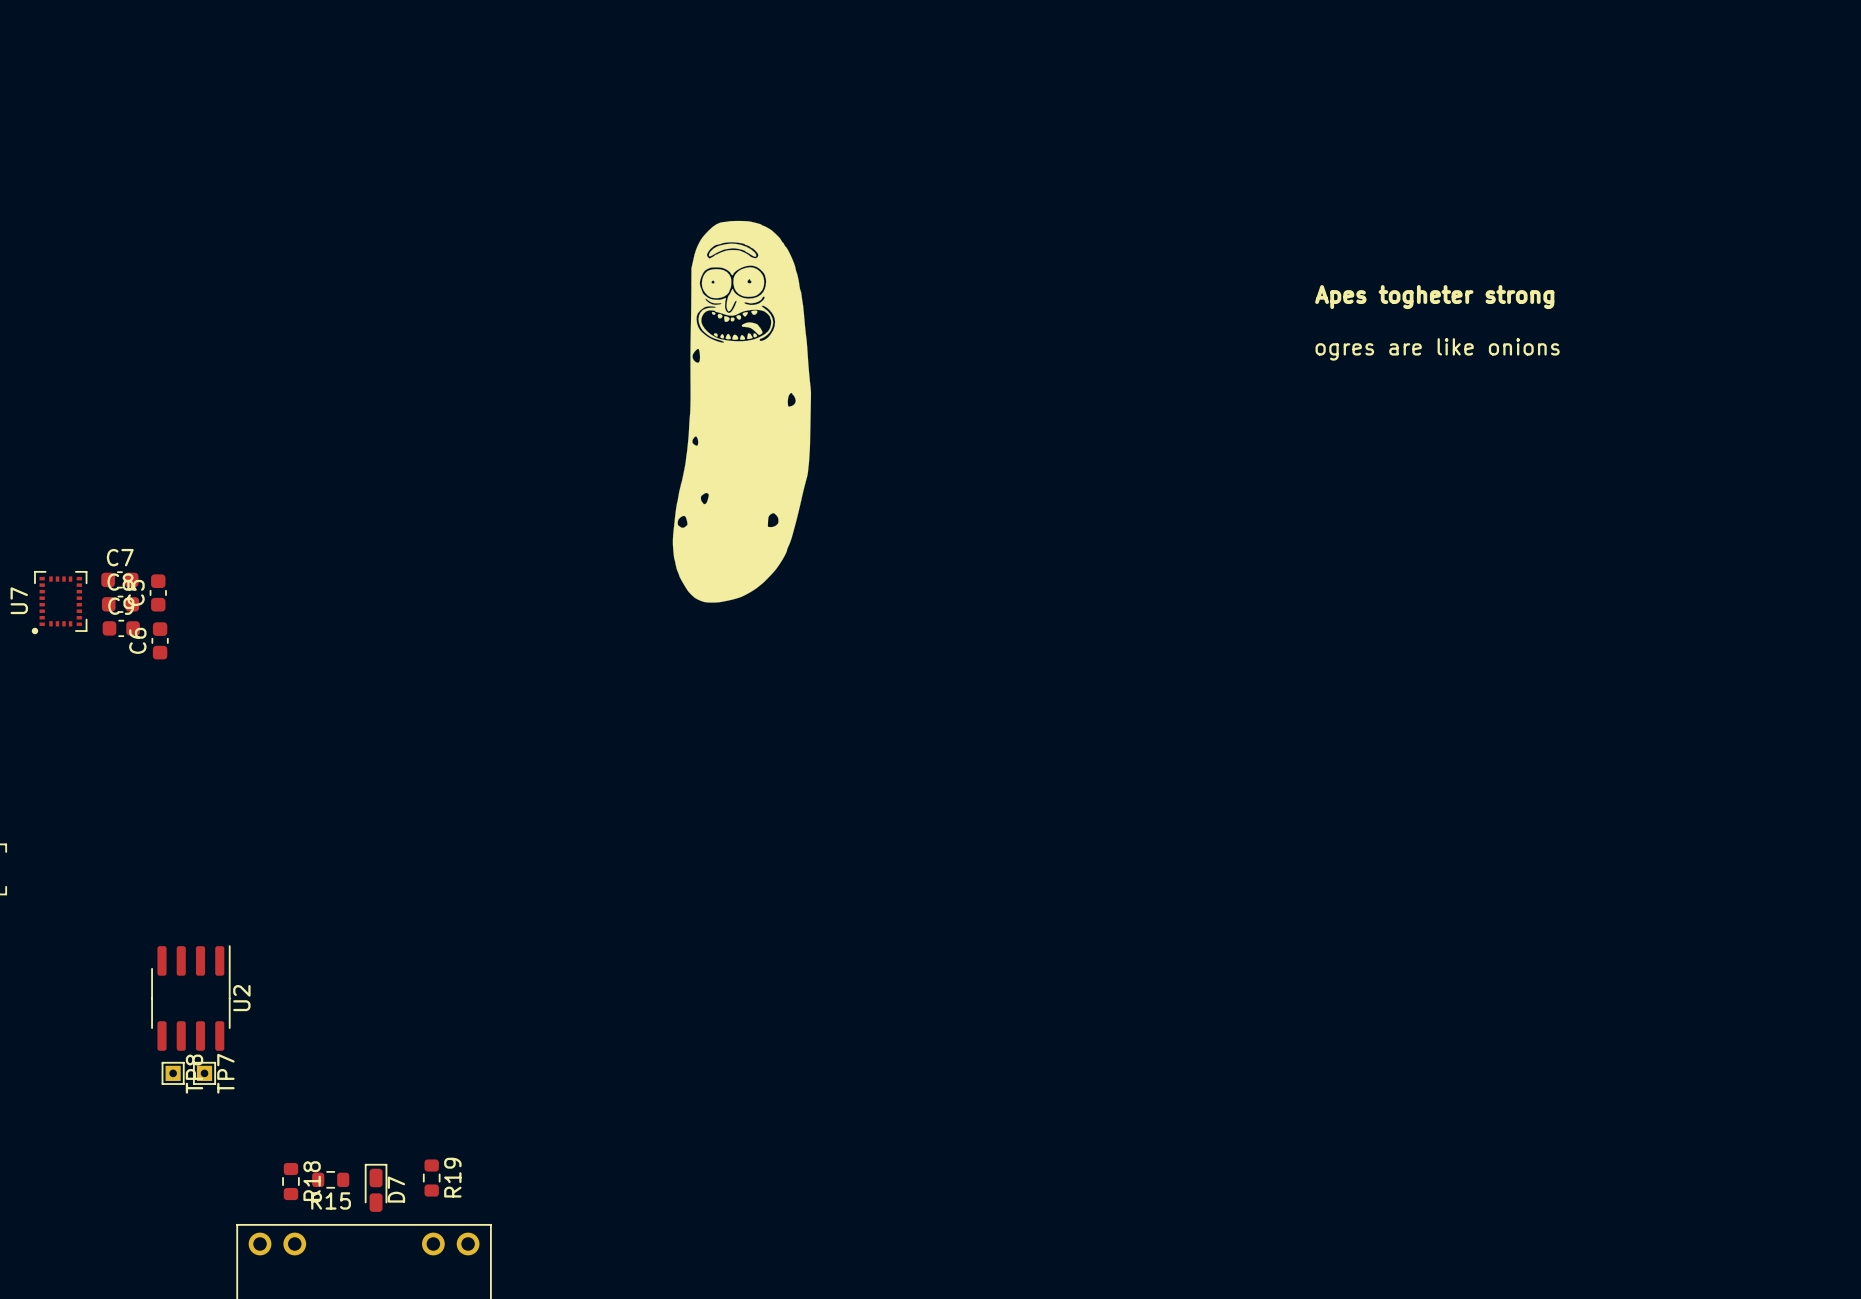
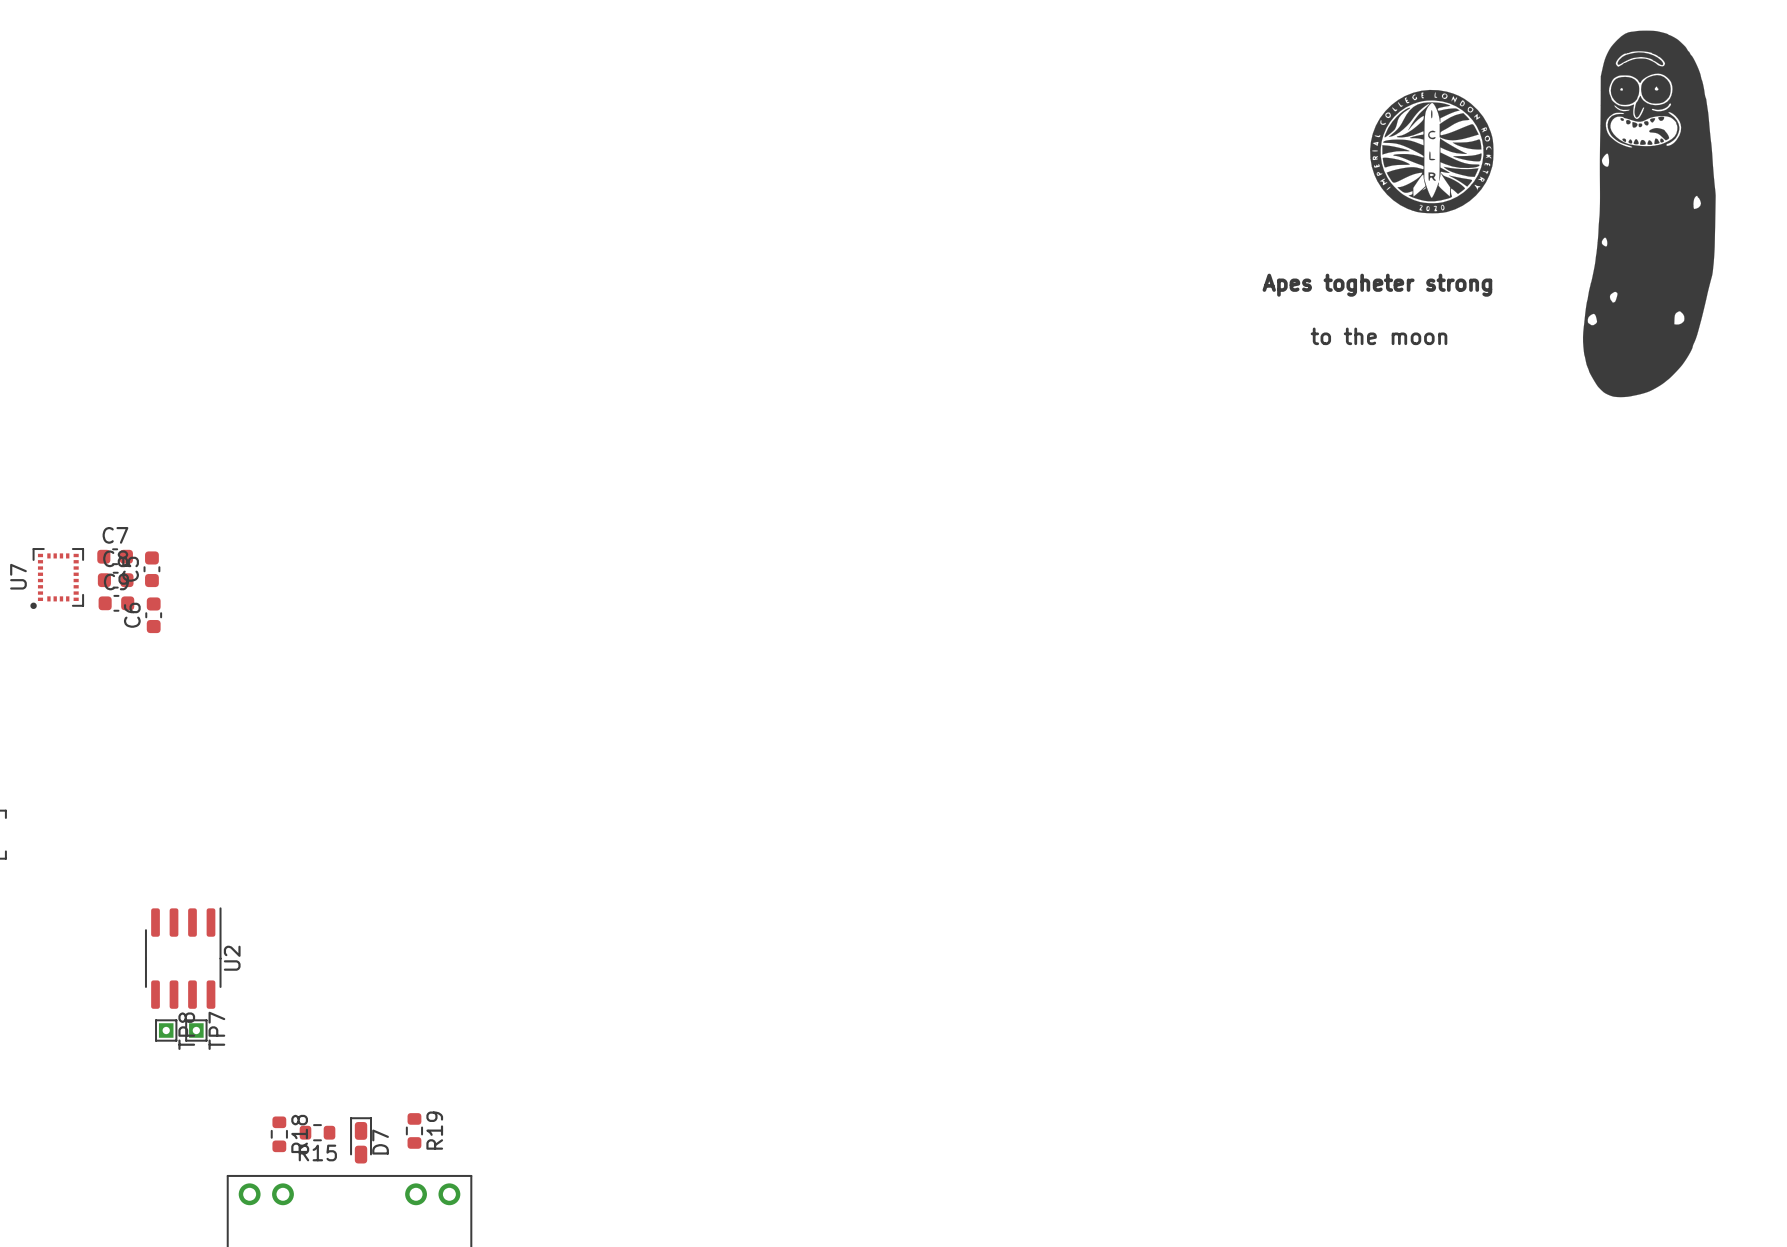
drawing: none -> [1582, 30, 1716, 398]
drawing: none -> [1370, 89, 1494, 214]
drawing: [672, 220, 812, 603] -> none
text: ogres are like onions (1437, 349) -> to the moon (1378, 336)

